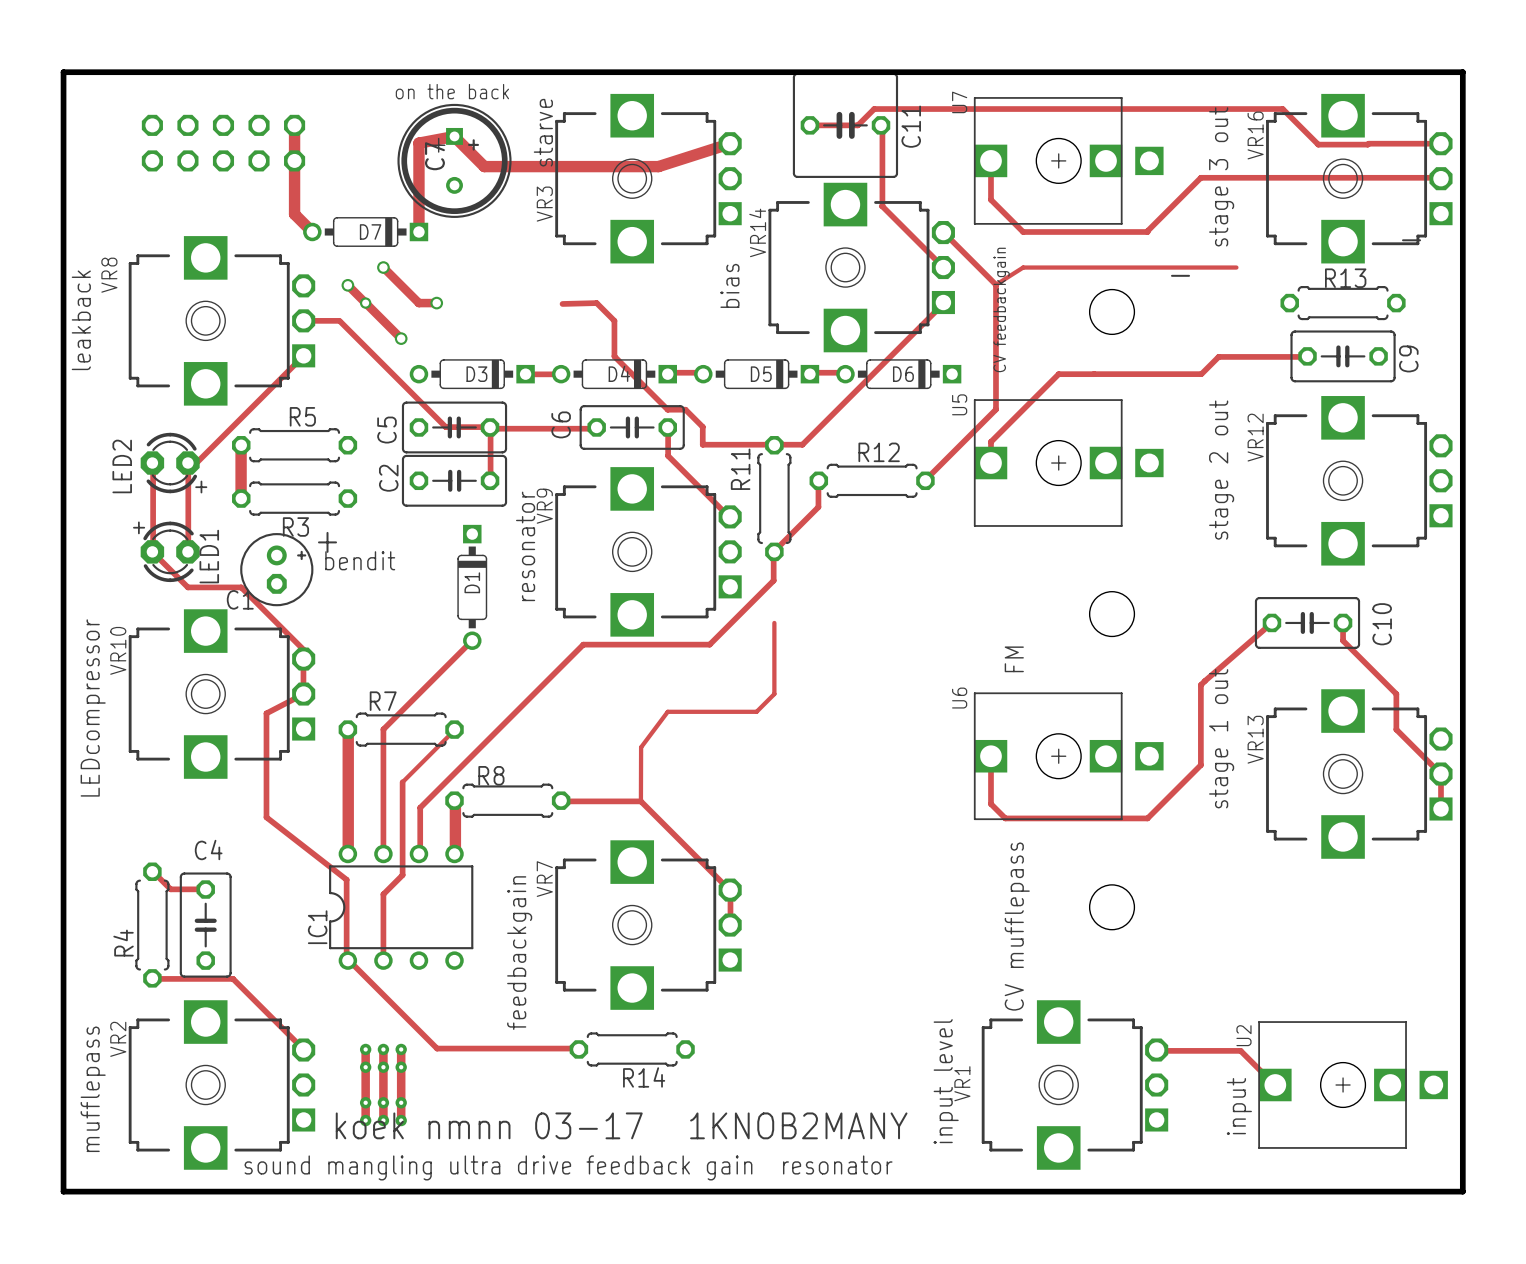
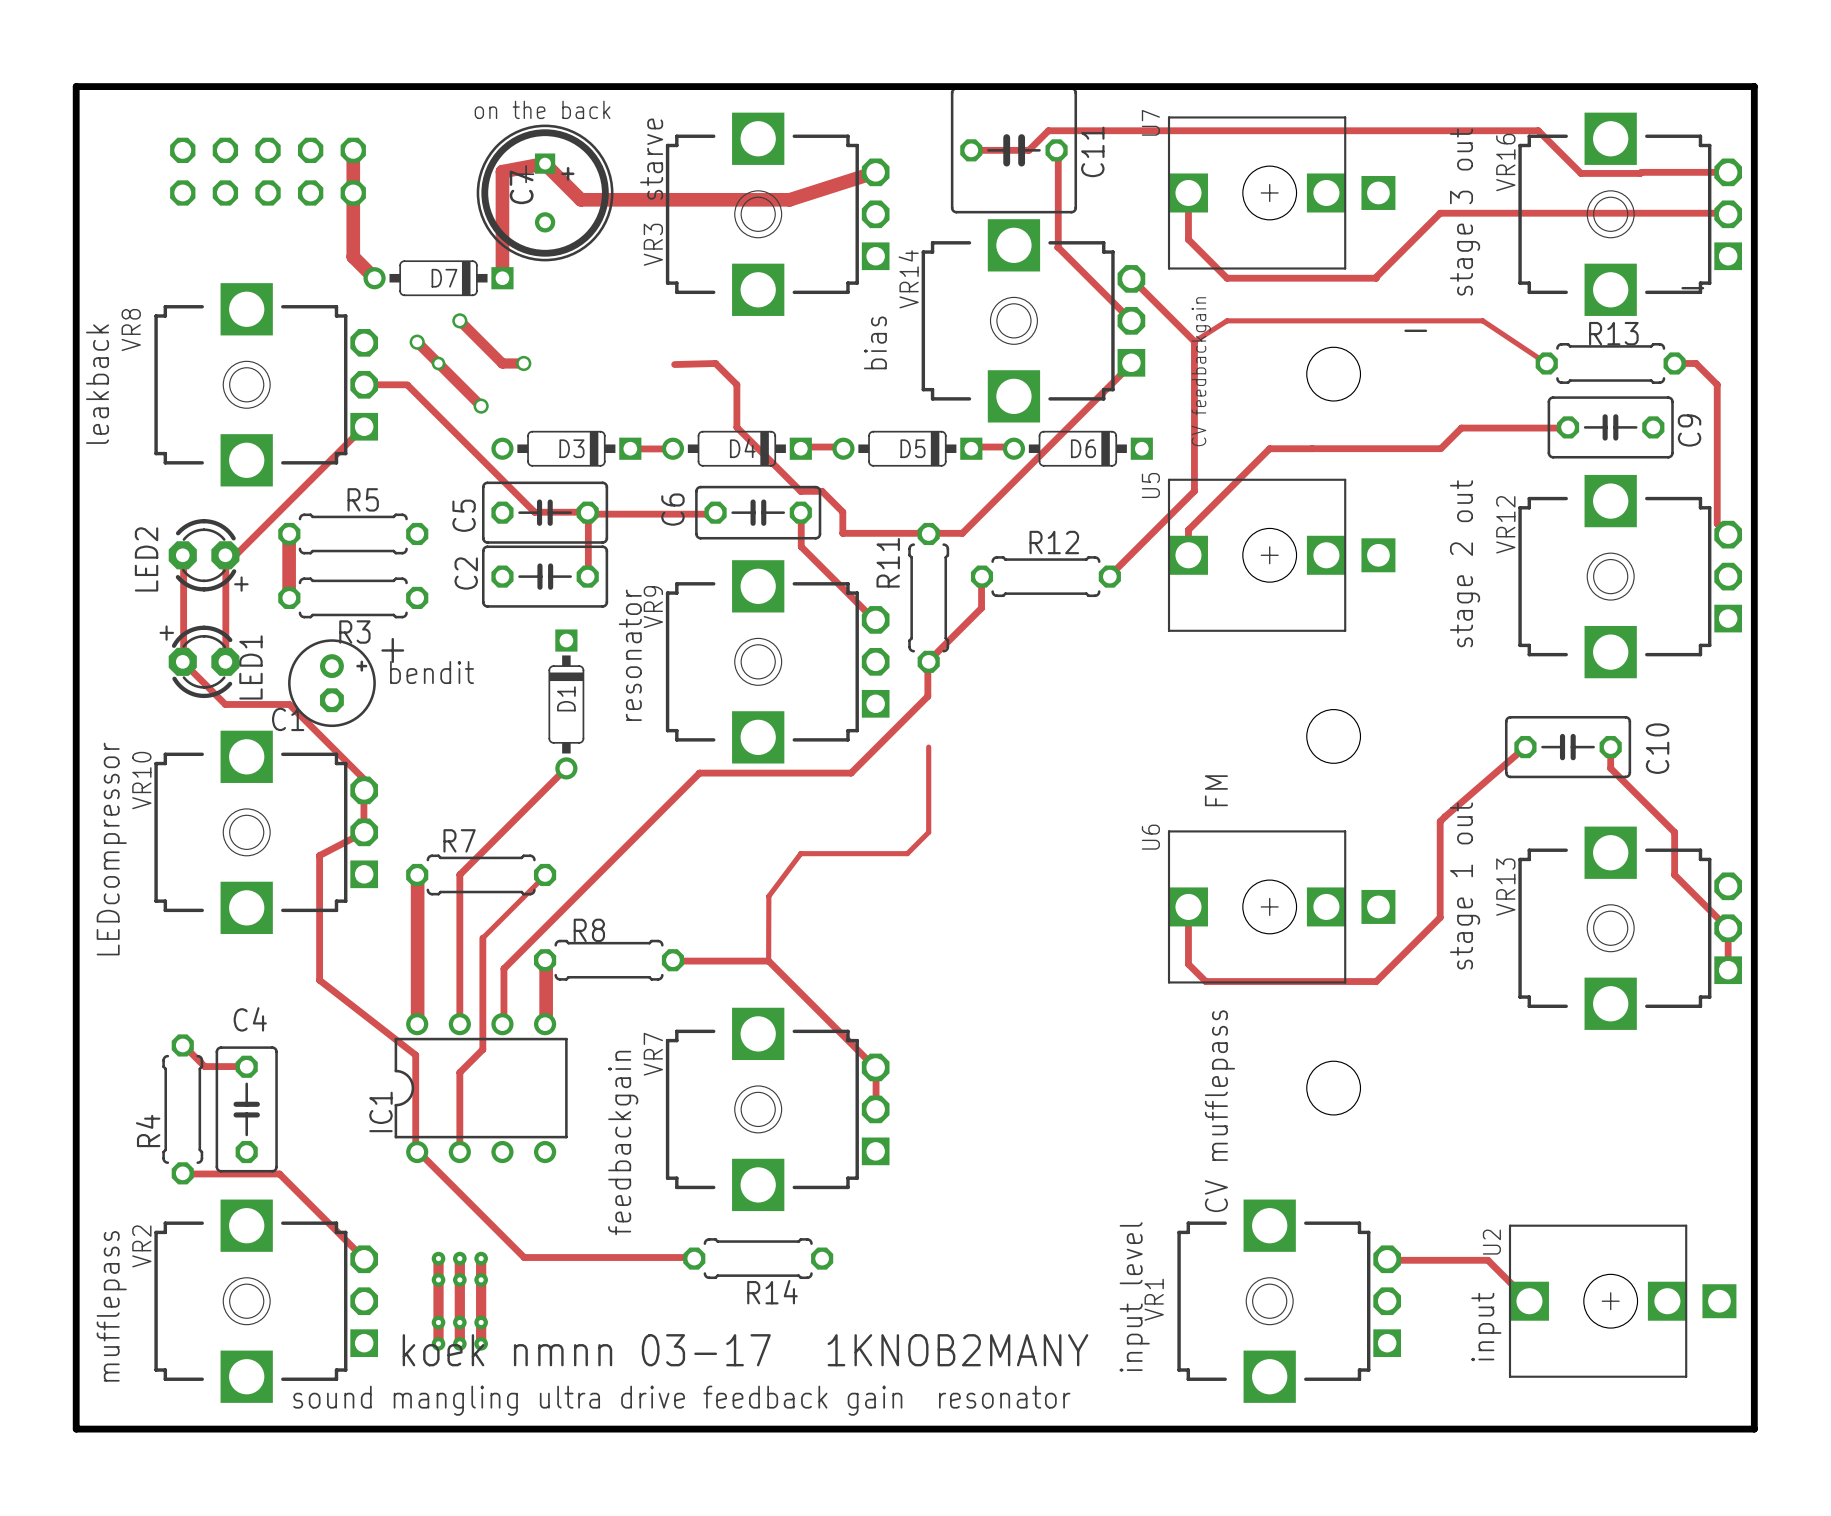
track: none -> (1482, 320) (1545, 362)
track: none -> (1674, 363) (1695, 363) (1717, 384) (1717, 523) (1728, 534)

